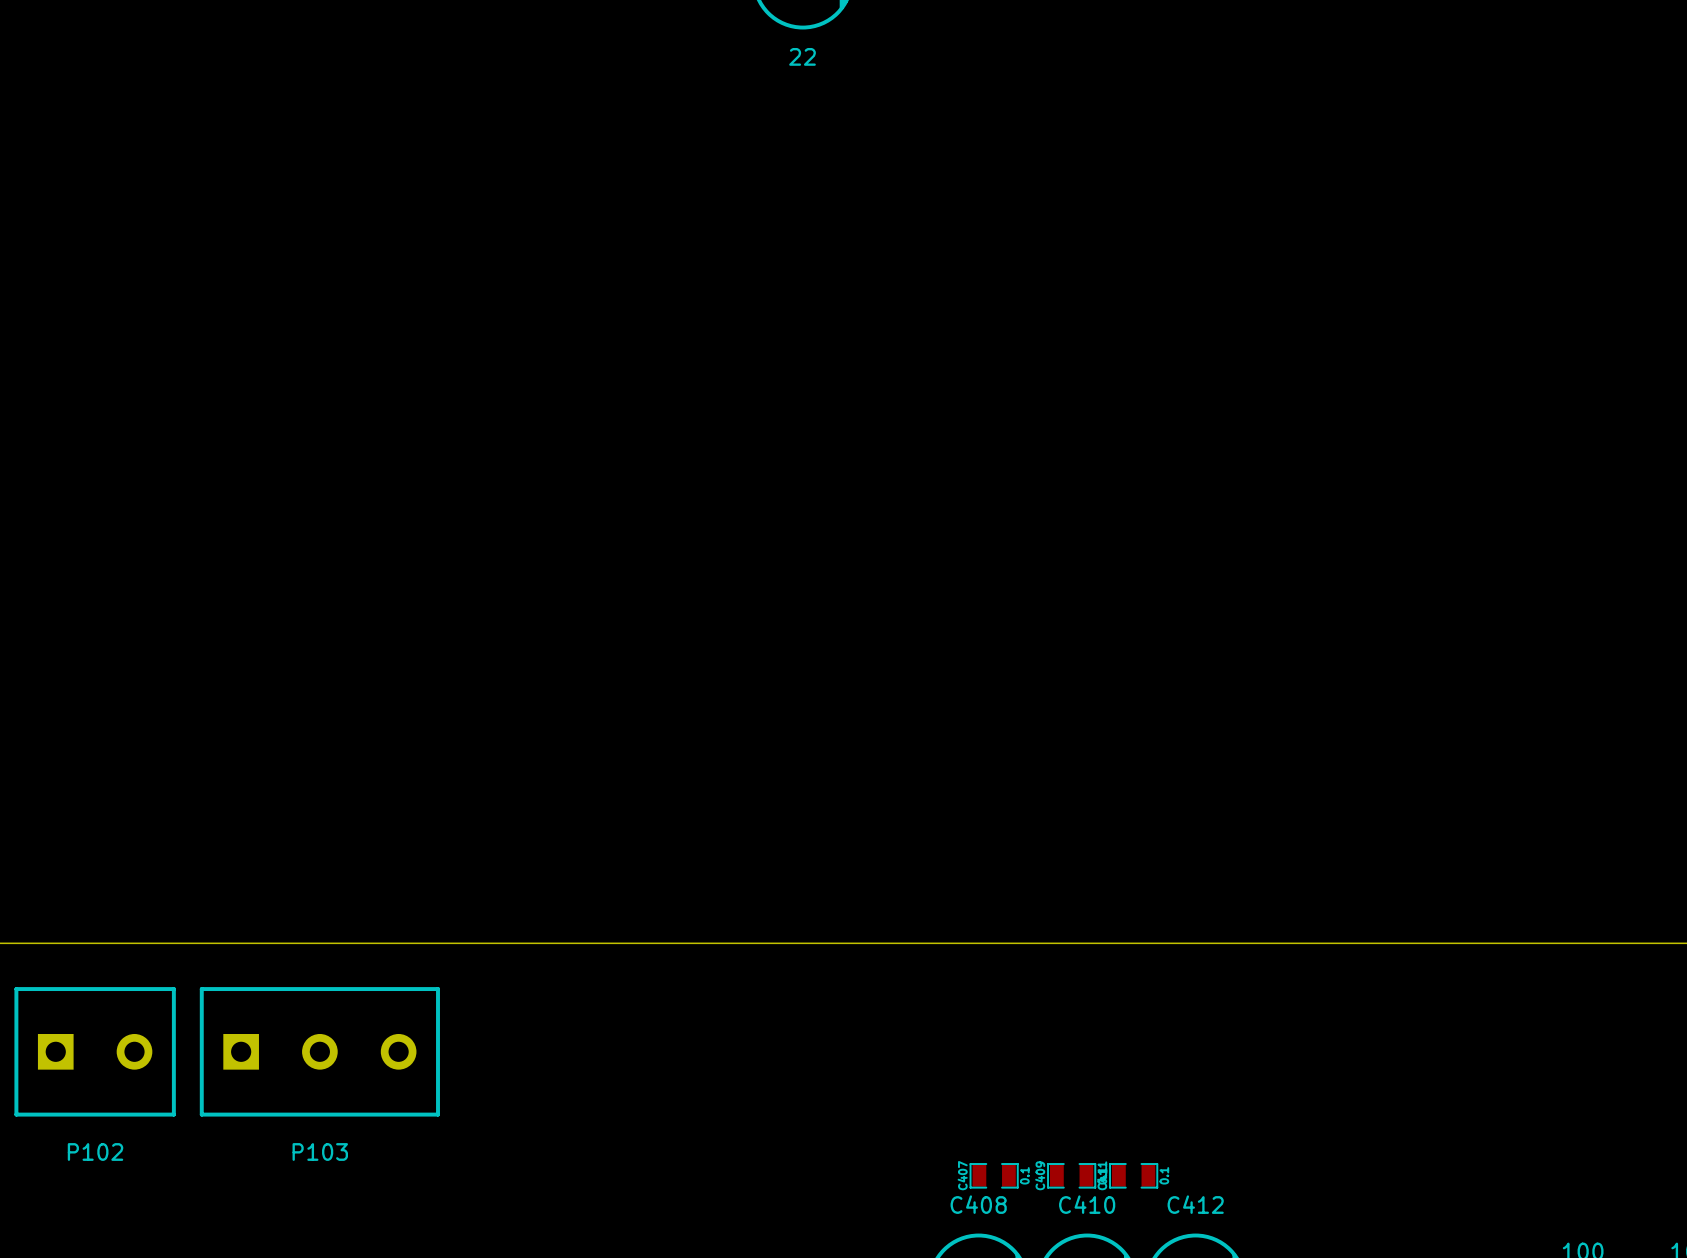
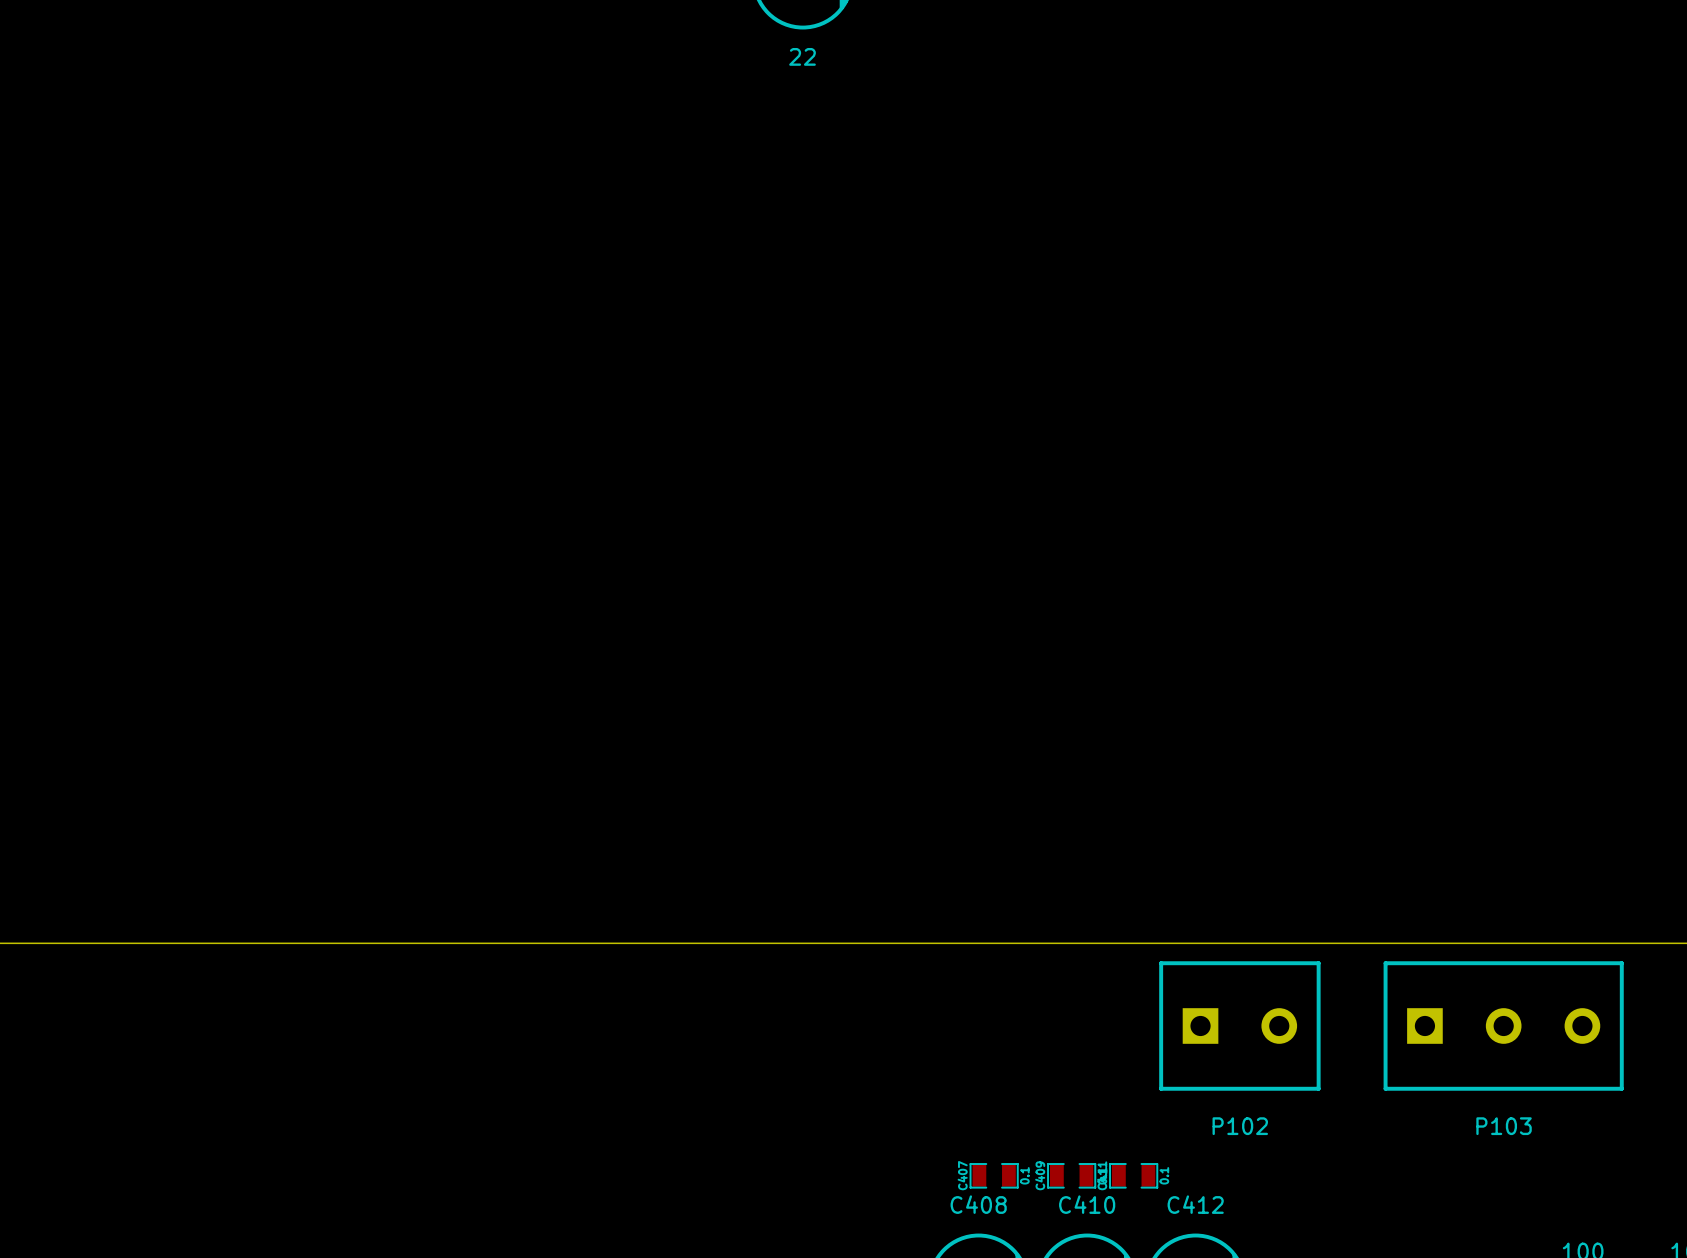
P102 position: (95, 1051) -> (1239, 1025)
P103 position: (319, 1051) -> (1503, 1025)

